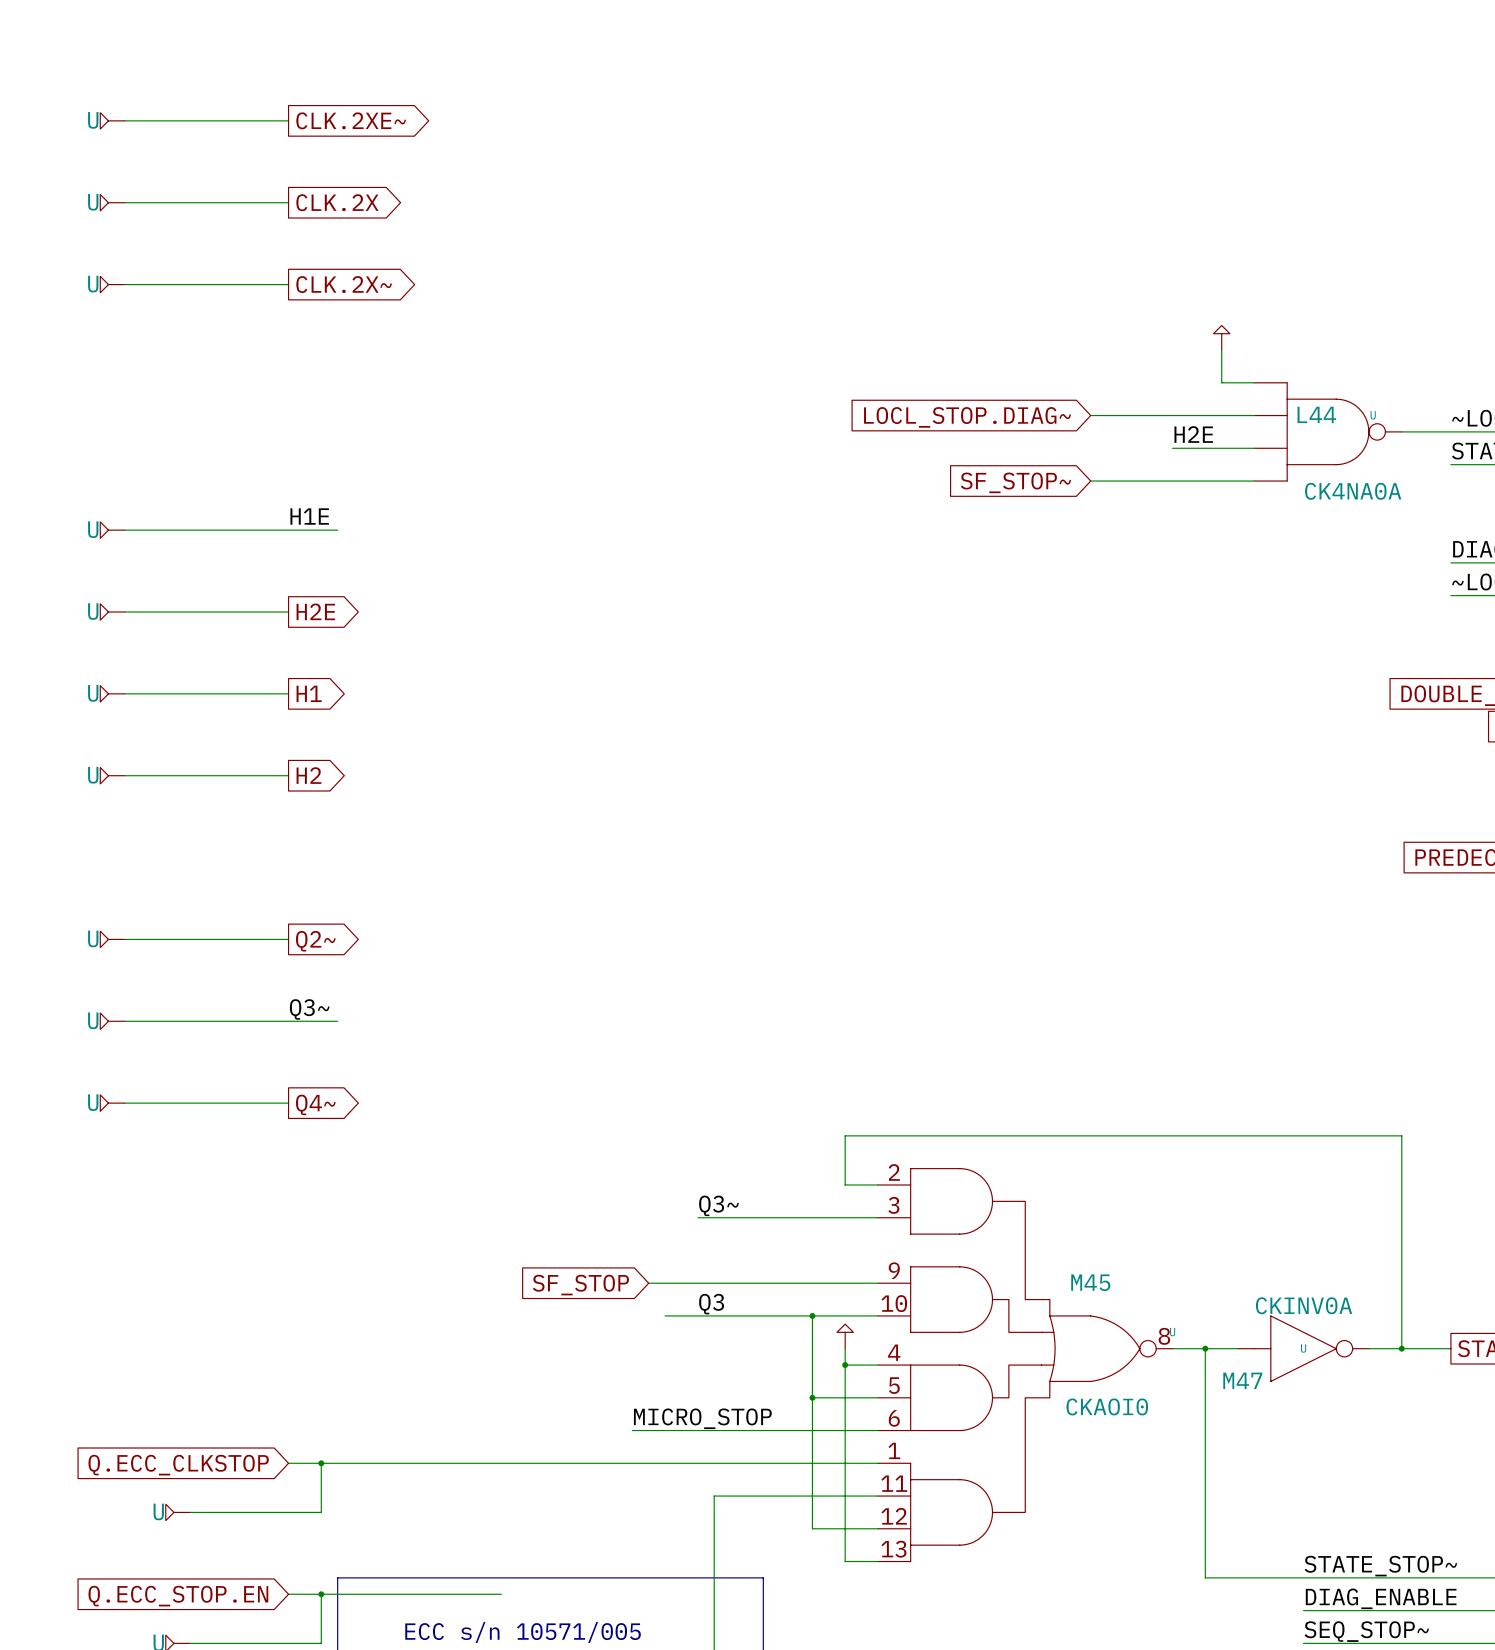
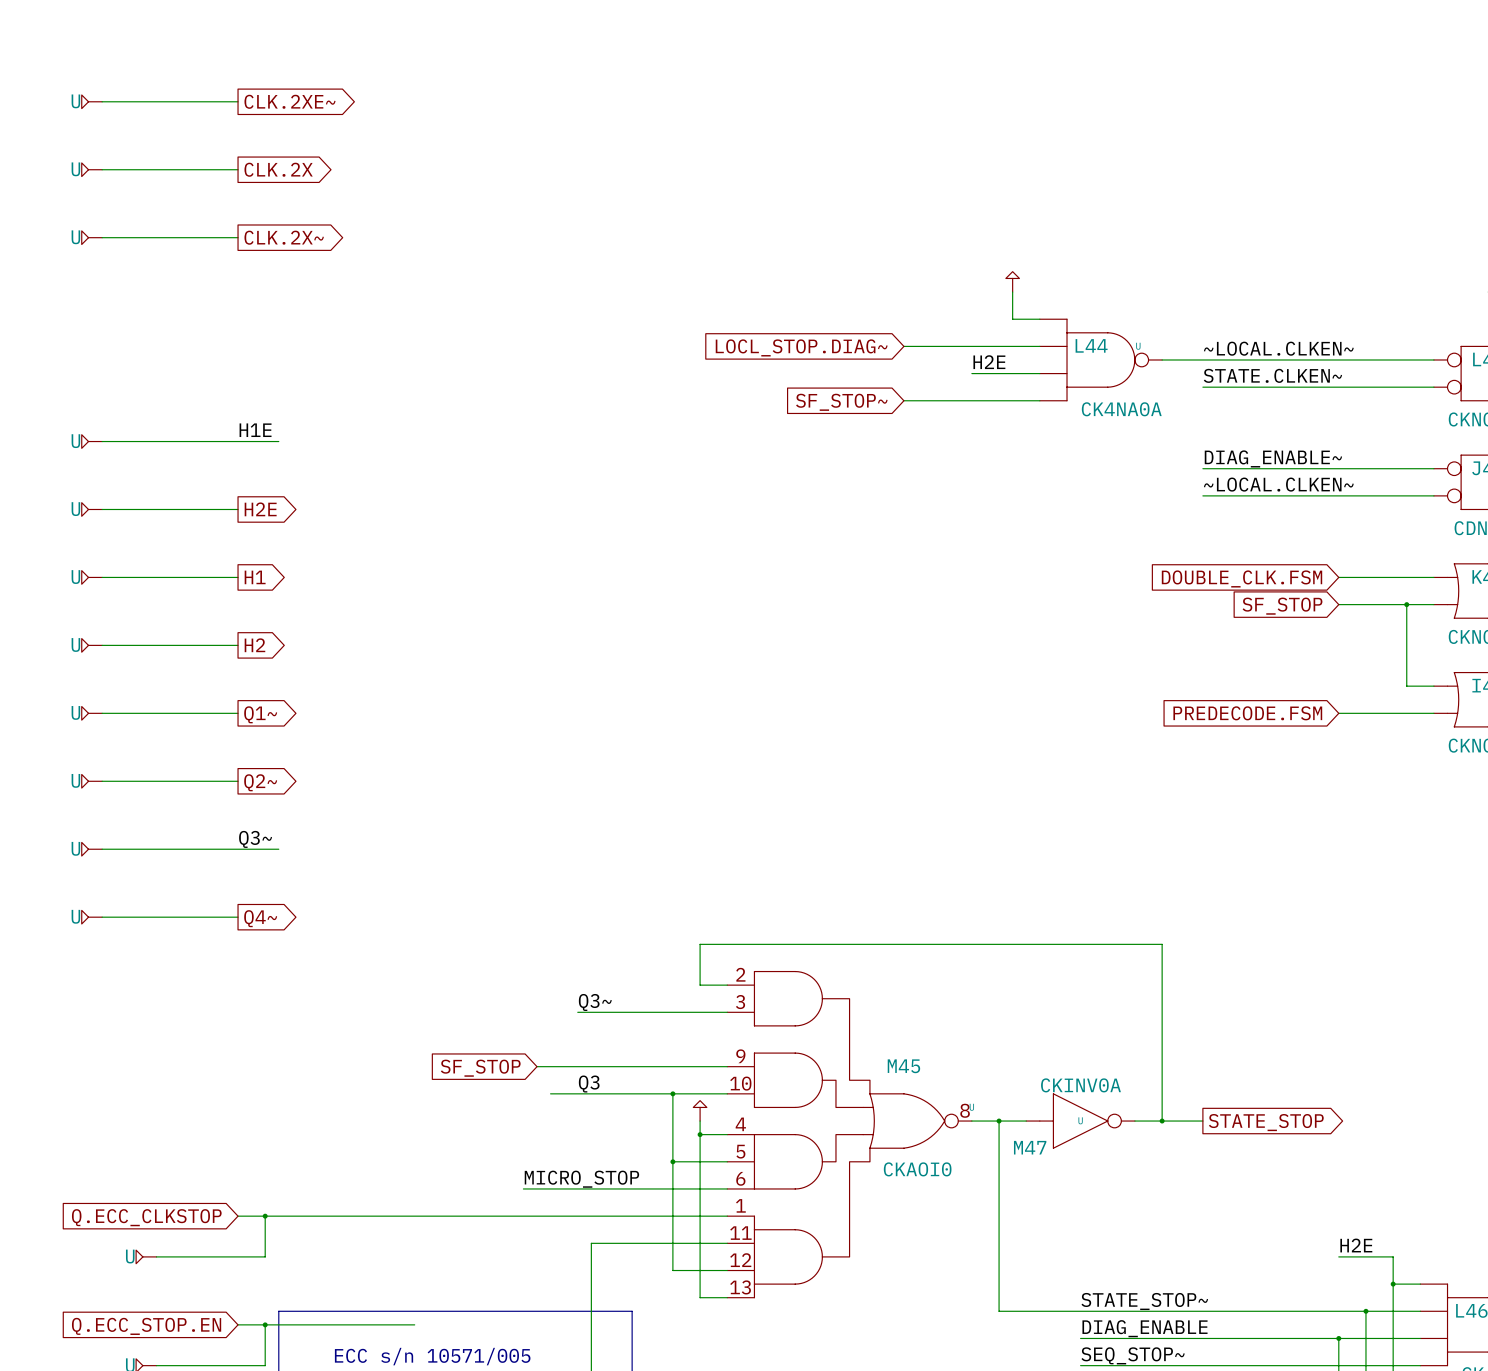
U: none -> (91, 713)
wire: none -> (102, 713) (238, 713)
global label: none -> Q1~ (260, 714)

